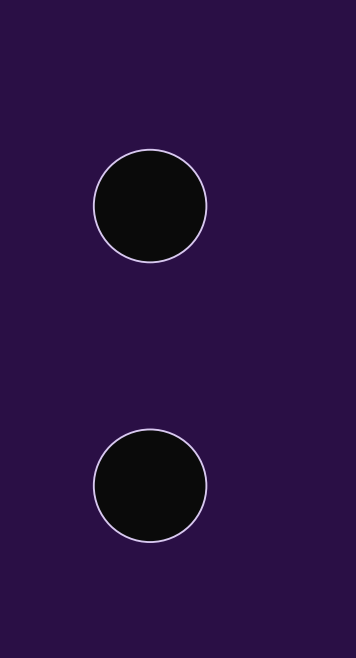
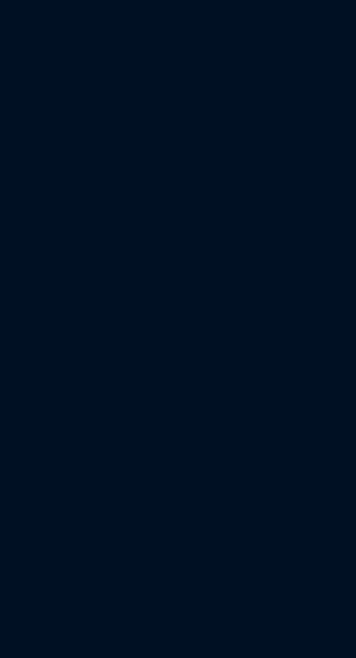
part: (150, 206) -> none
part: (150, 485) -> none

